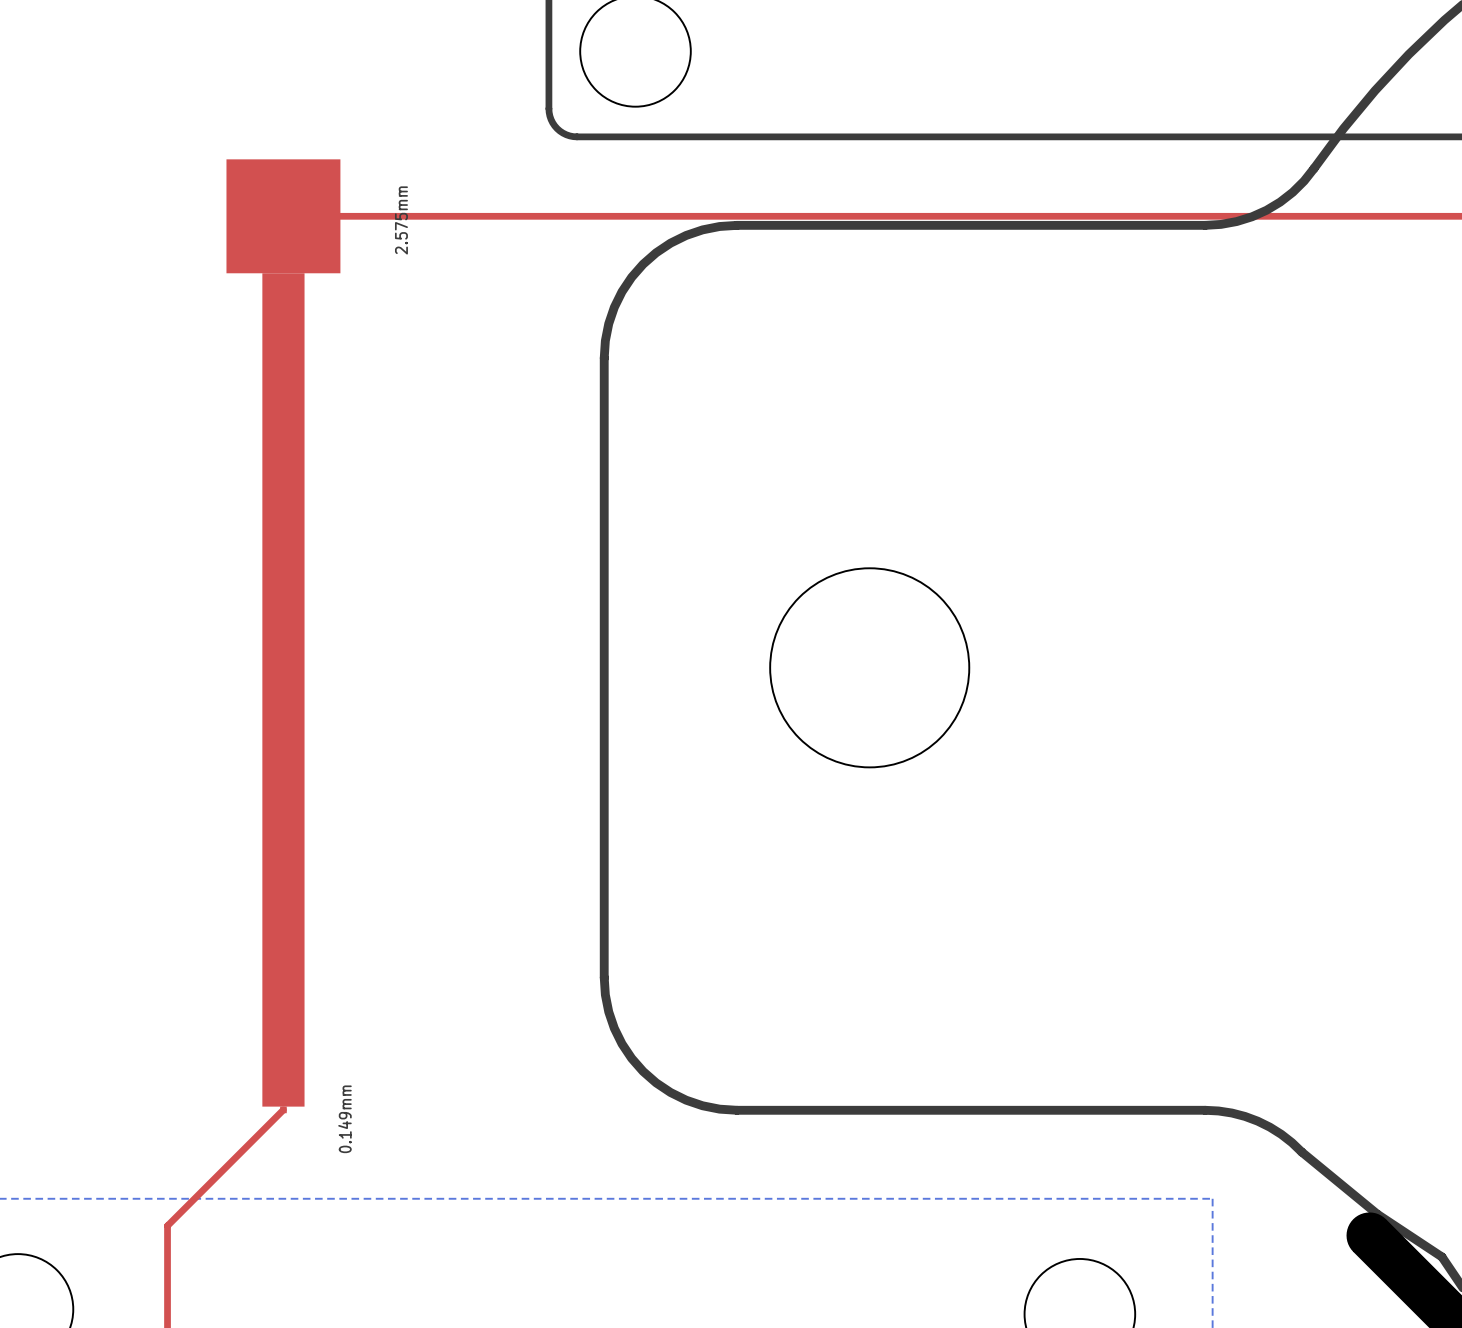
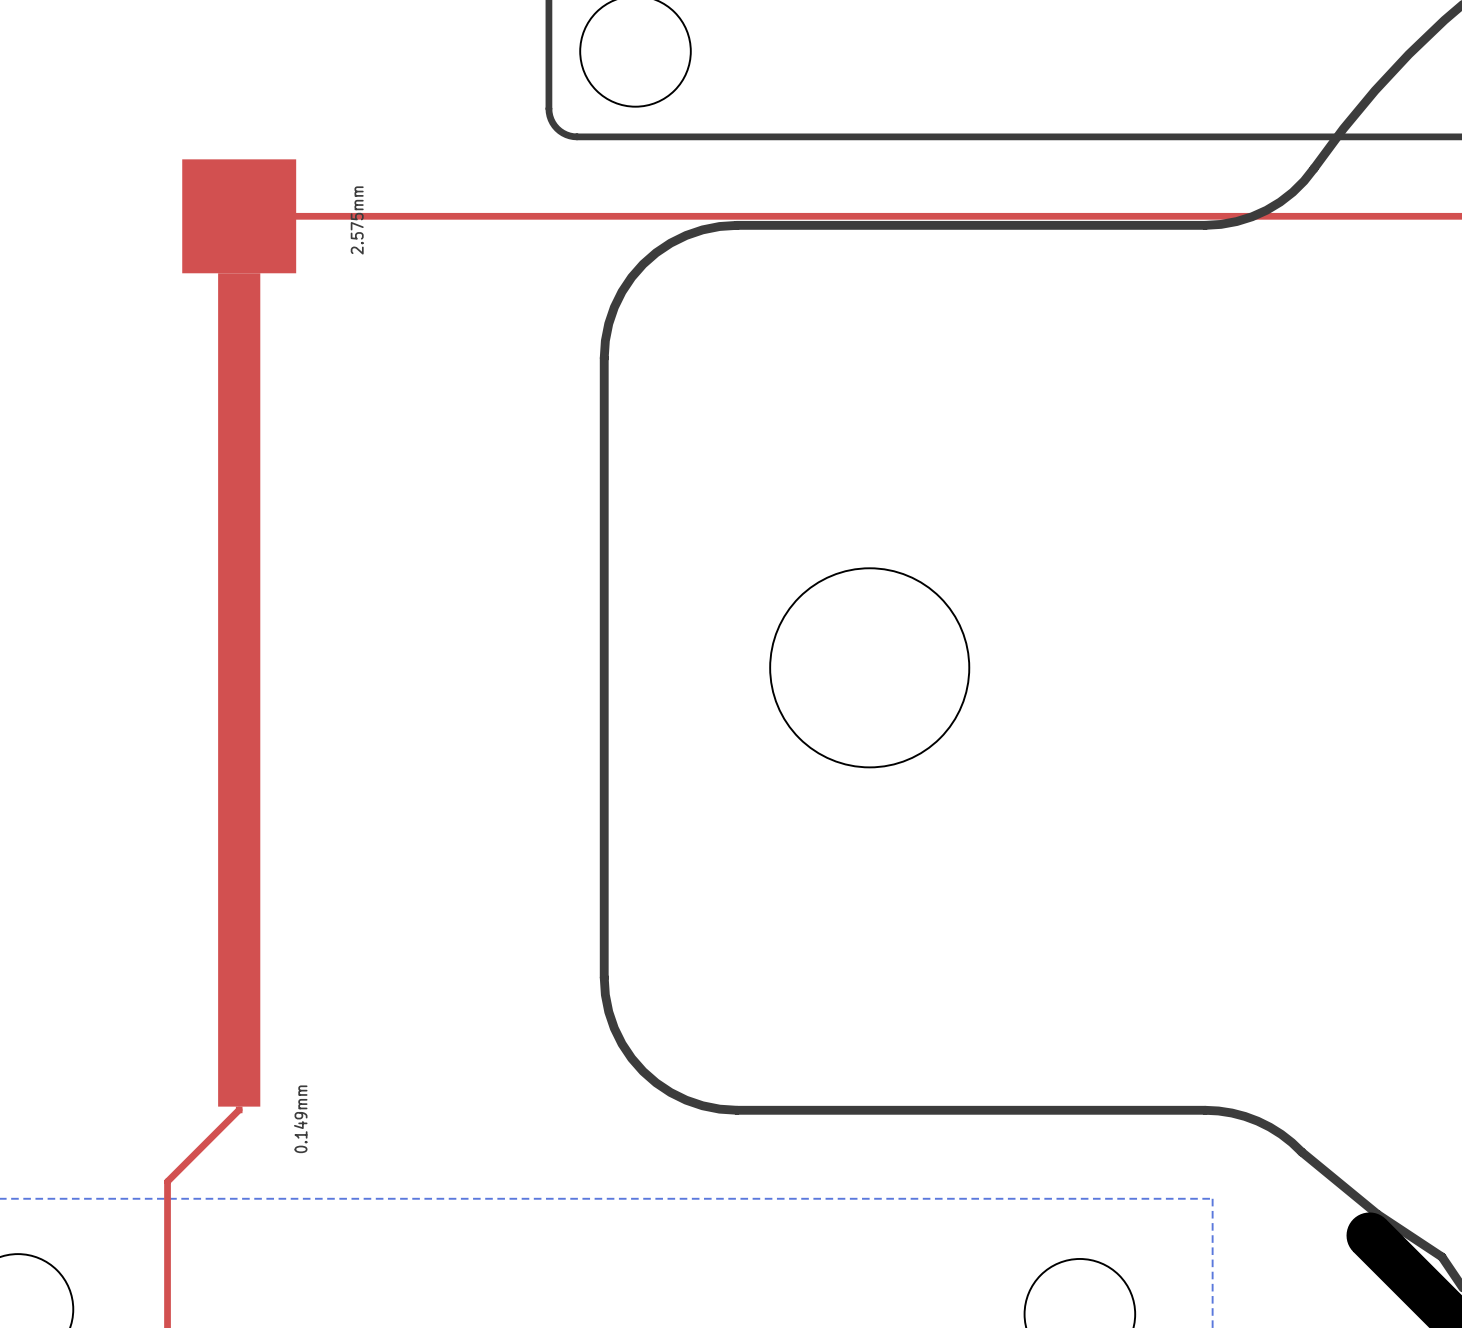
part position: (283, 636) -> (239, 636)
top track: (283, 1109) (167, 1225) -> (239, 1109) (167, 1181) (167, 1225)

